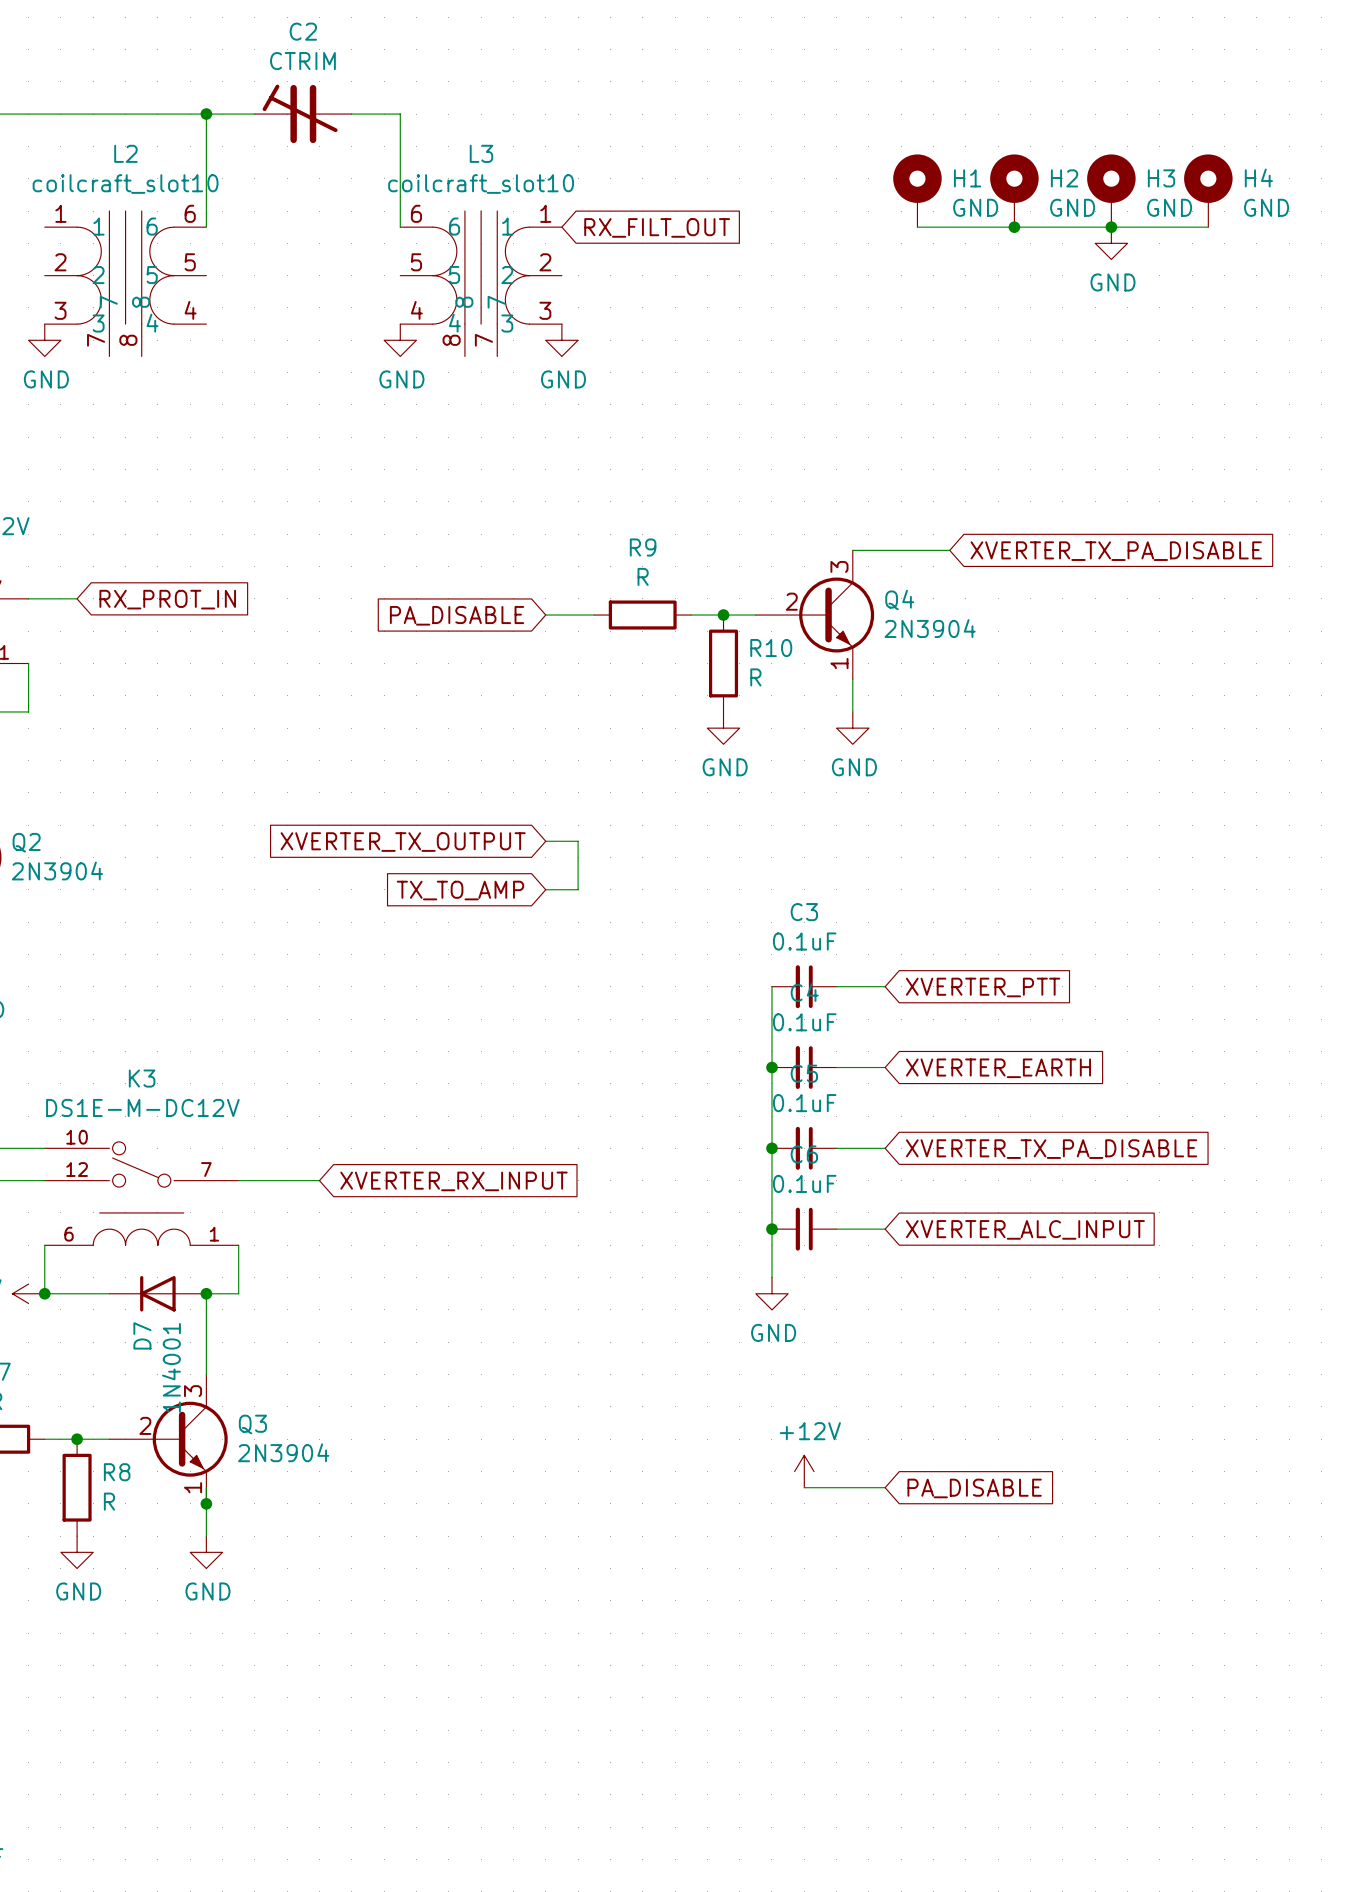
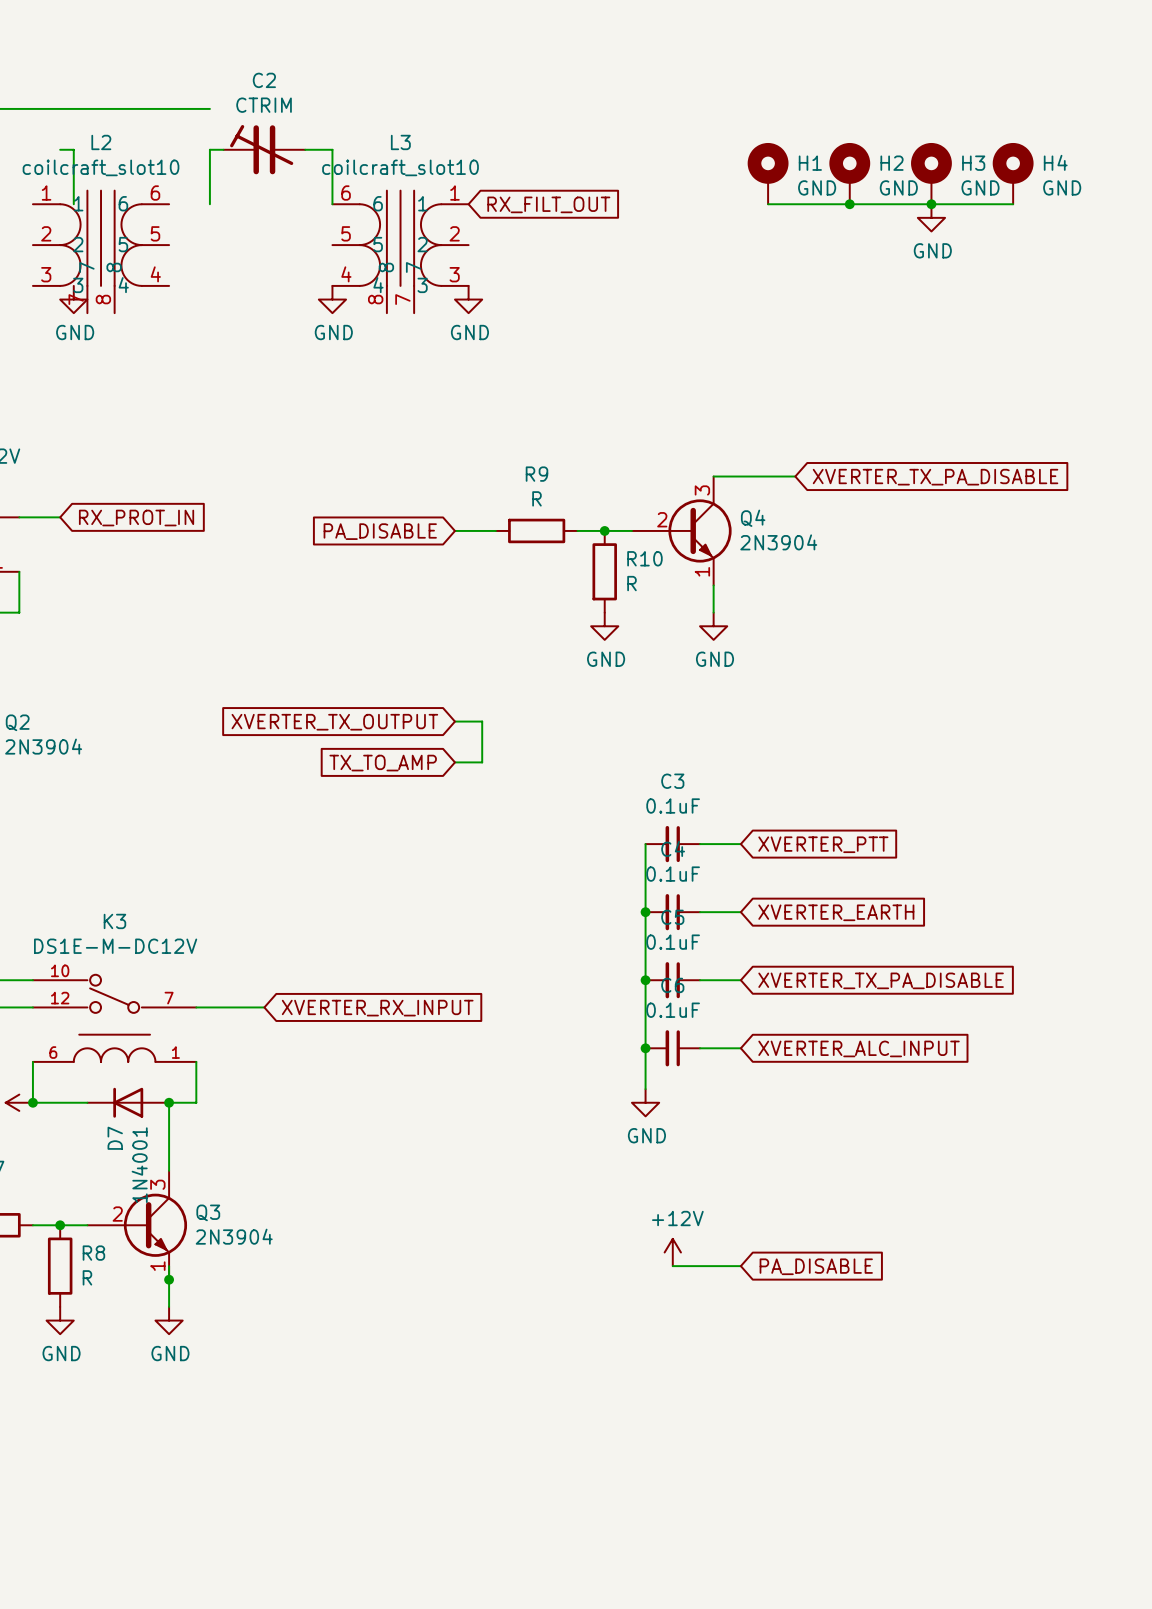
C2 position: (303, 113) -> (264, 149)
wire: (206, 114) (206, 227) -> none
junction: (206, 114) -> none
wire: (351, 114) (400, 114) (400, 162) -> (305, 149) (332, 149)
wire: none -> (60, 149) (73, 149) (73, 204)
wire: none -> (223, 149) (209, 149) (209, 204)
power symbol: GND (44, 340) -> none
power symbol: none -> GND (73, 299)

